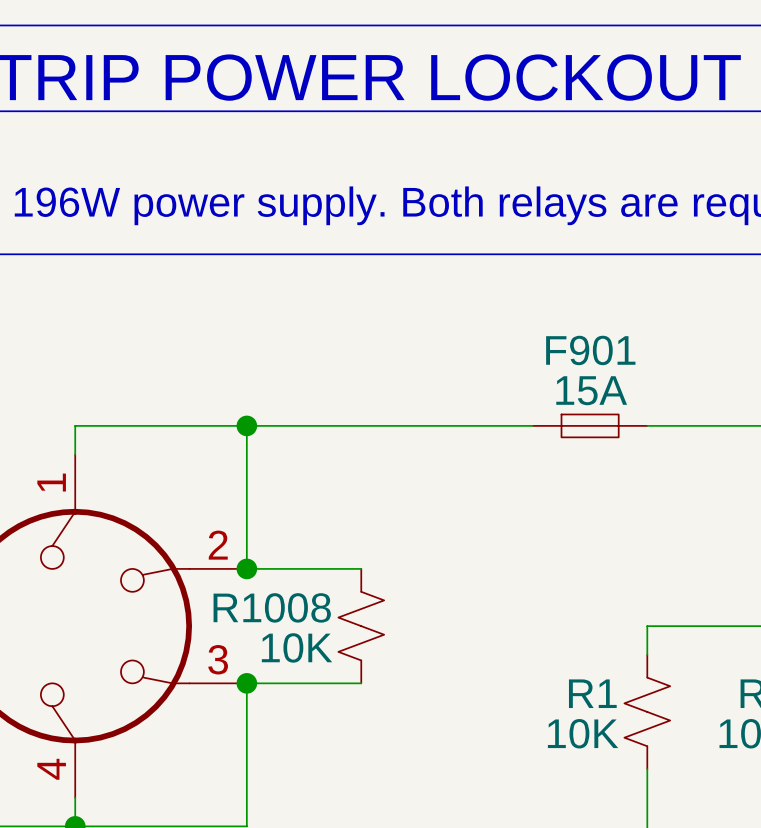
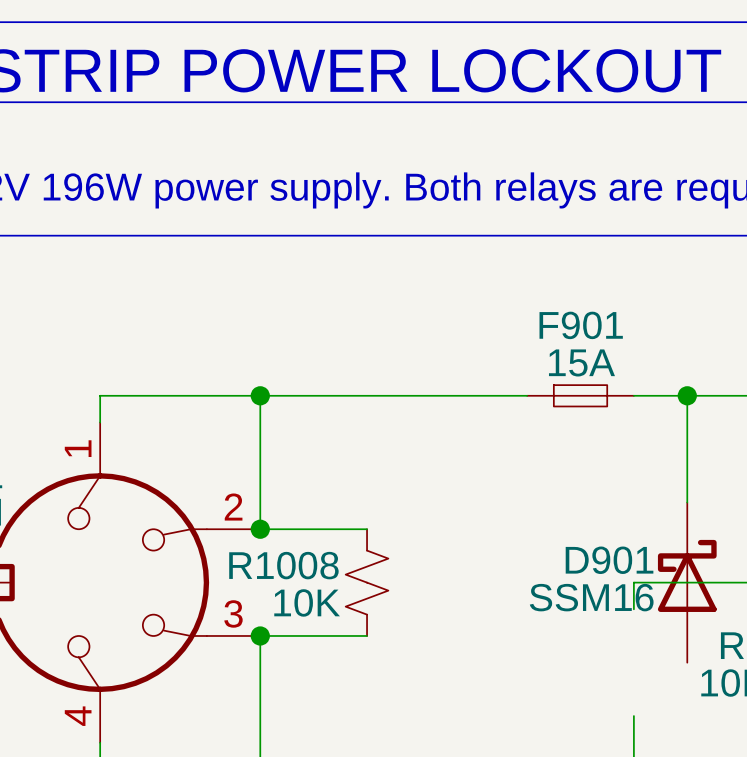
wire: none -> (687, 395) (687, 502)
junction: none -> (687, 395)
D901: none -> SSM16 (687, 582)
R1: 10K (647, 711) -> none

